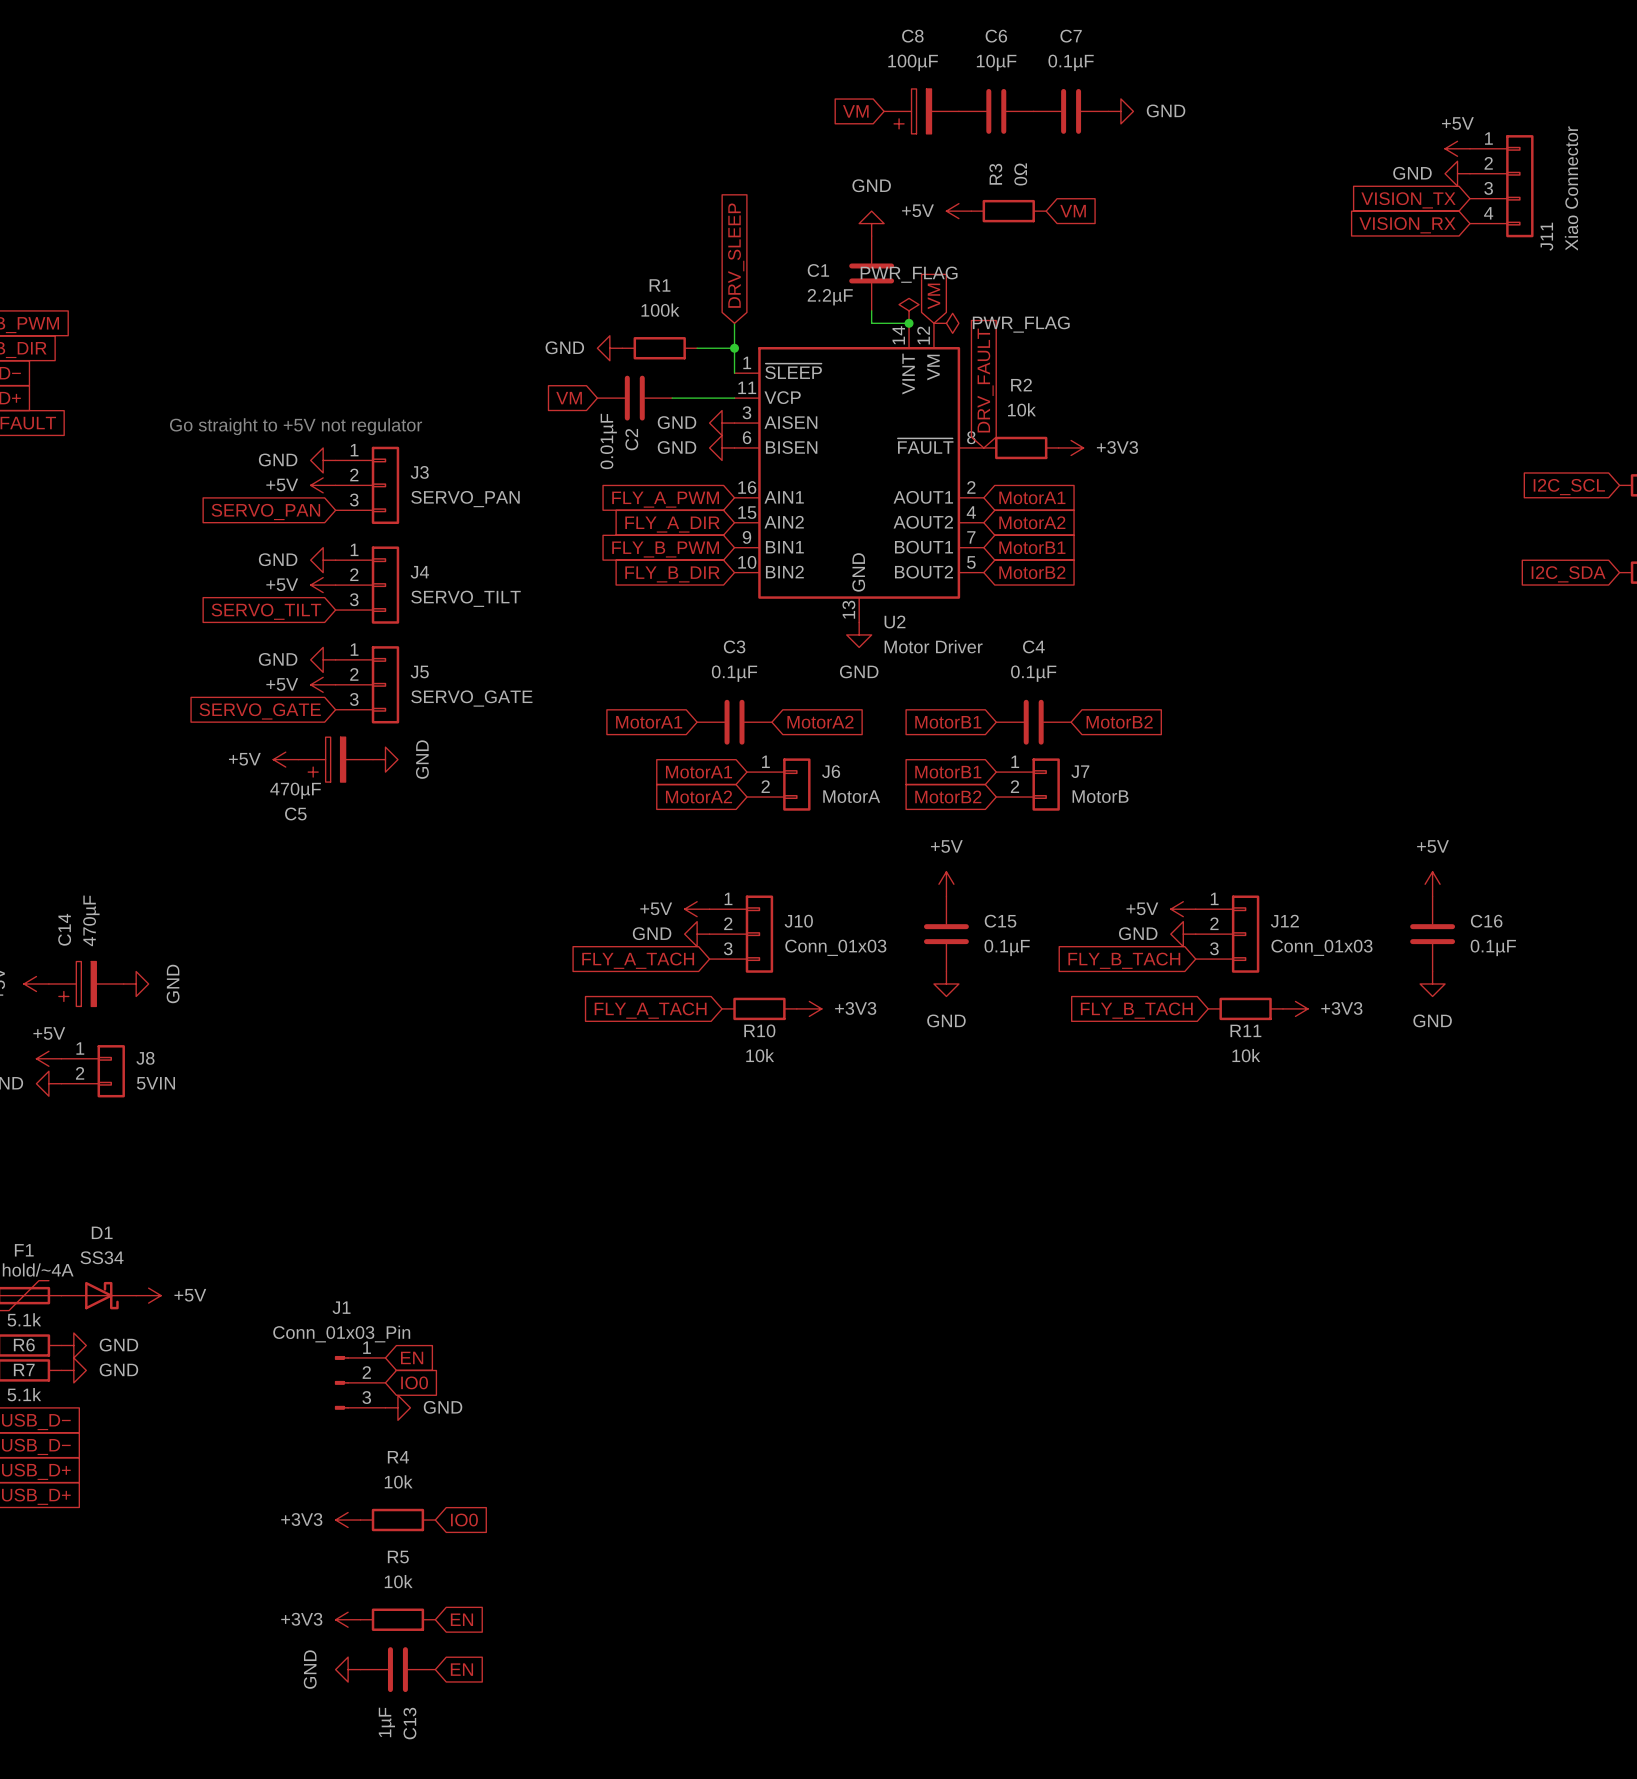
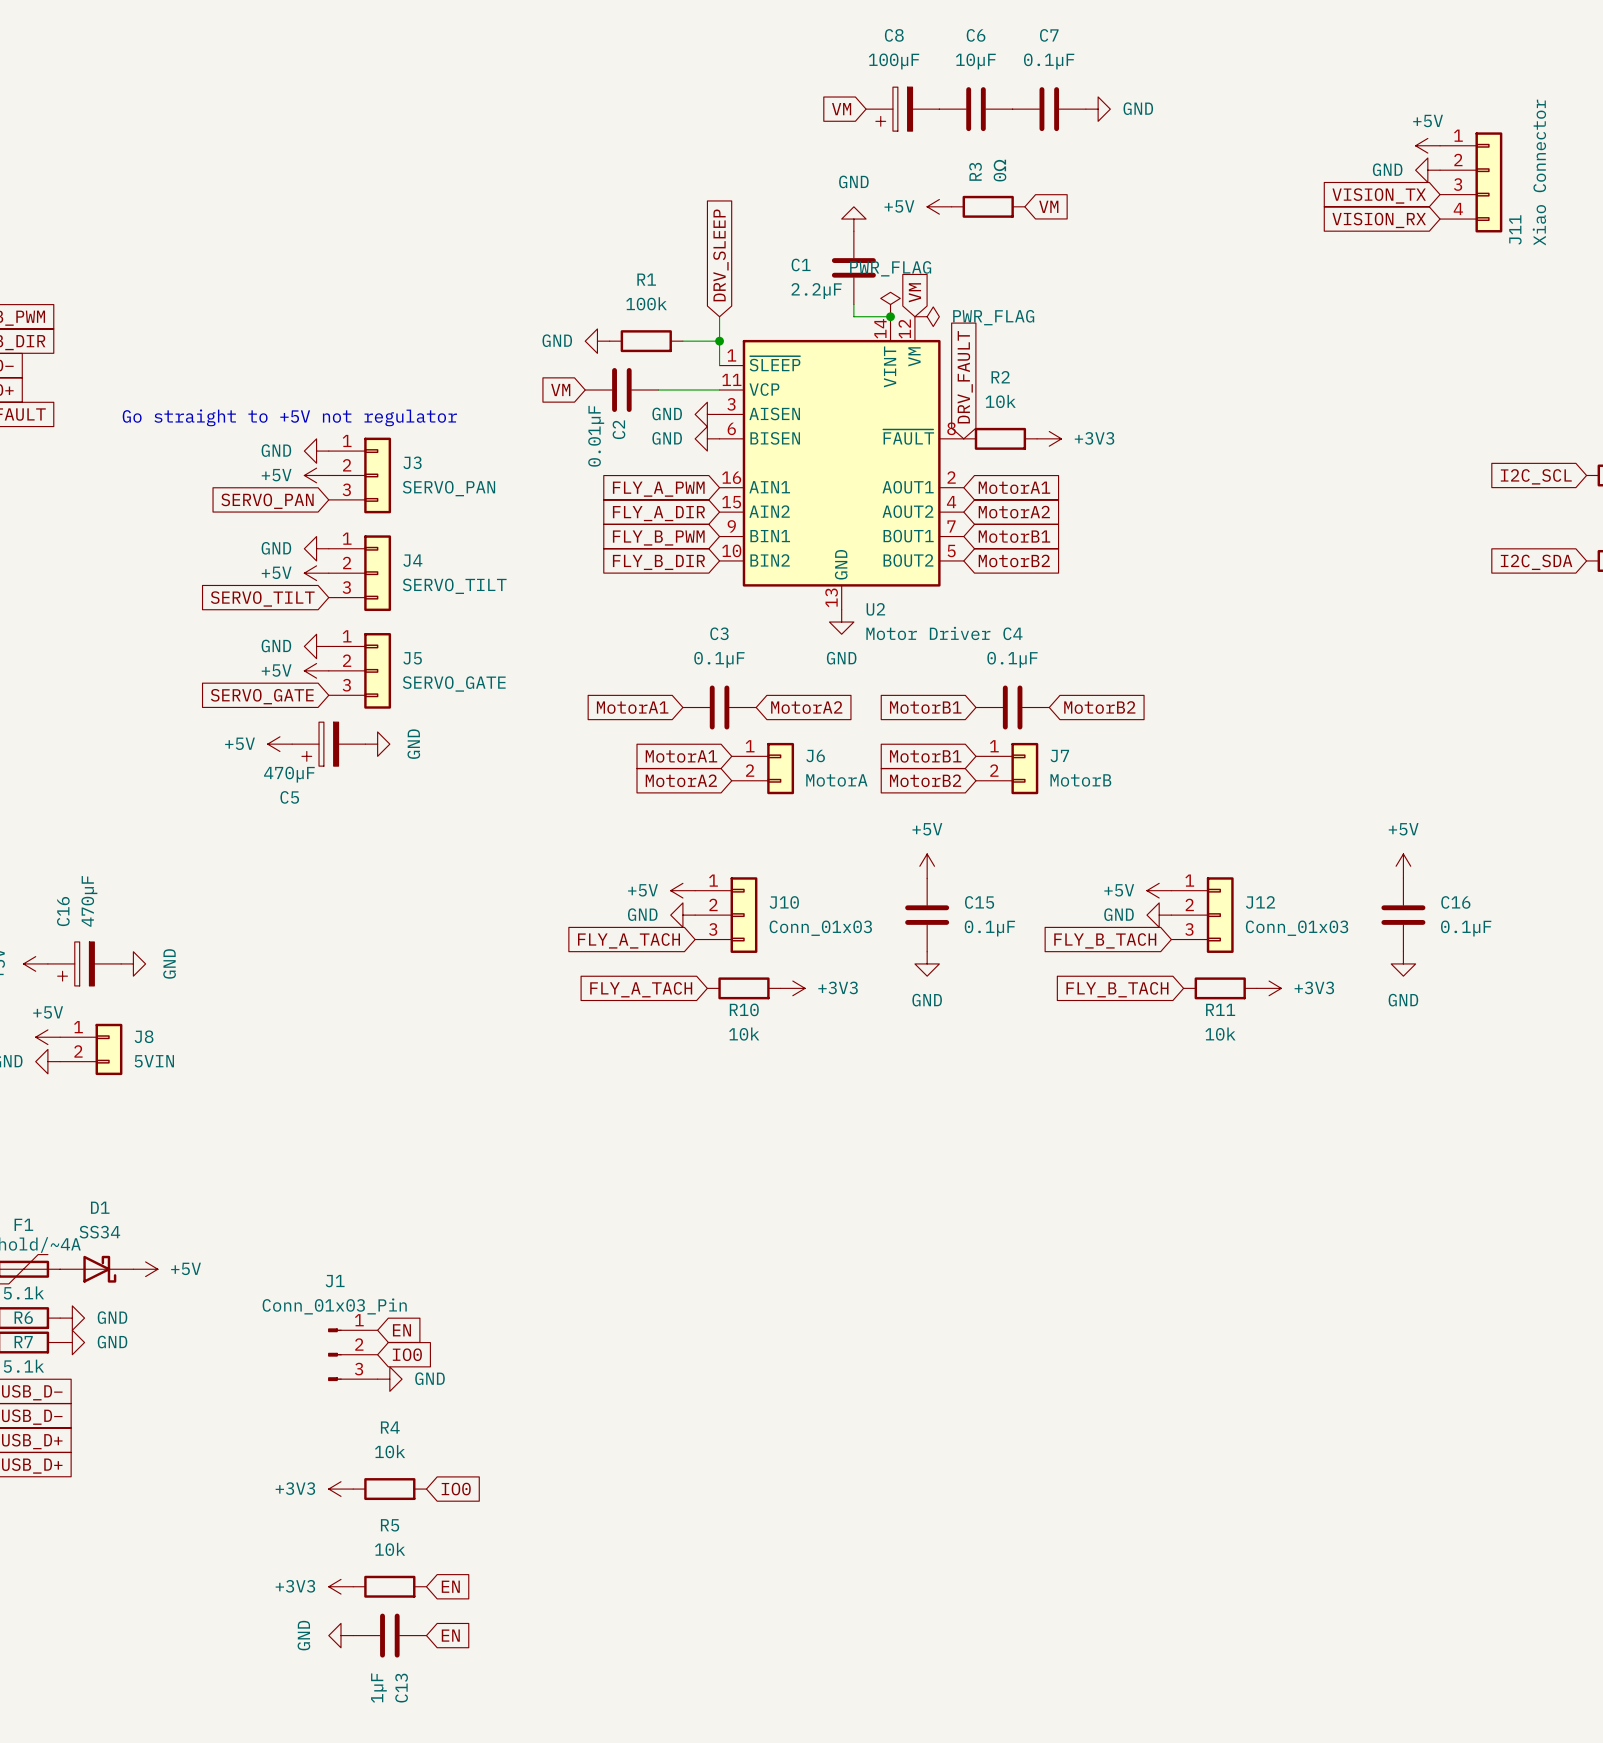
C14 name: C14 (64, 929) -> C16 (63, 911)

